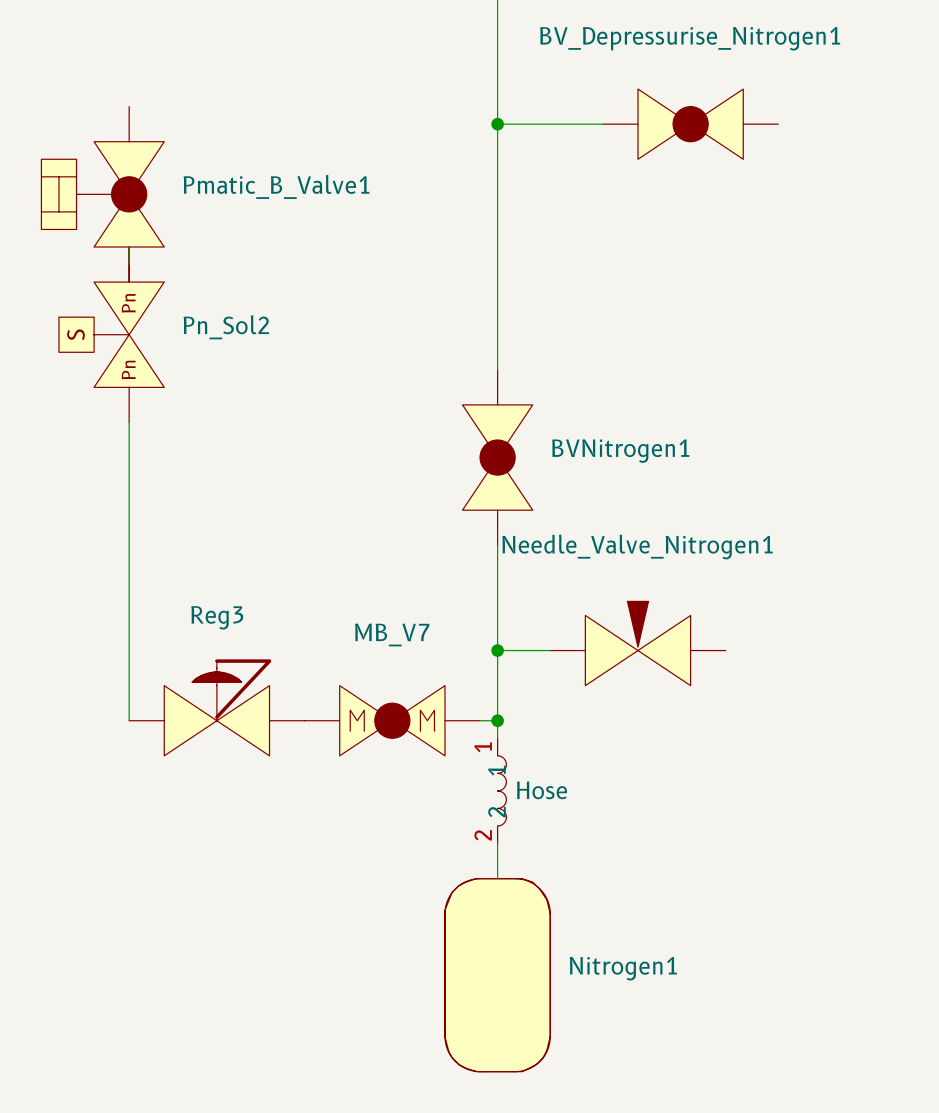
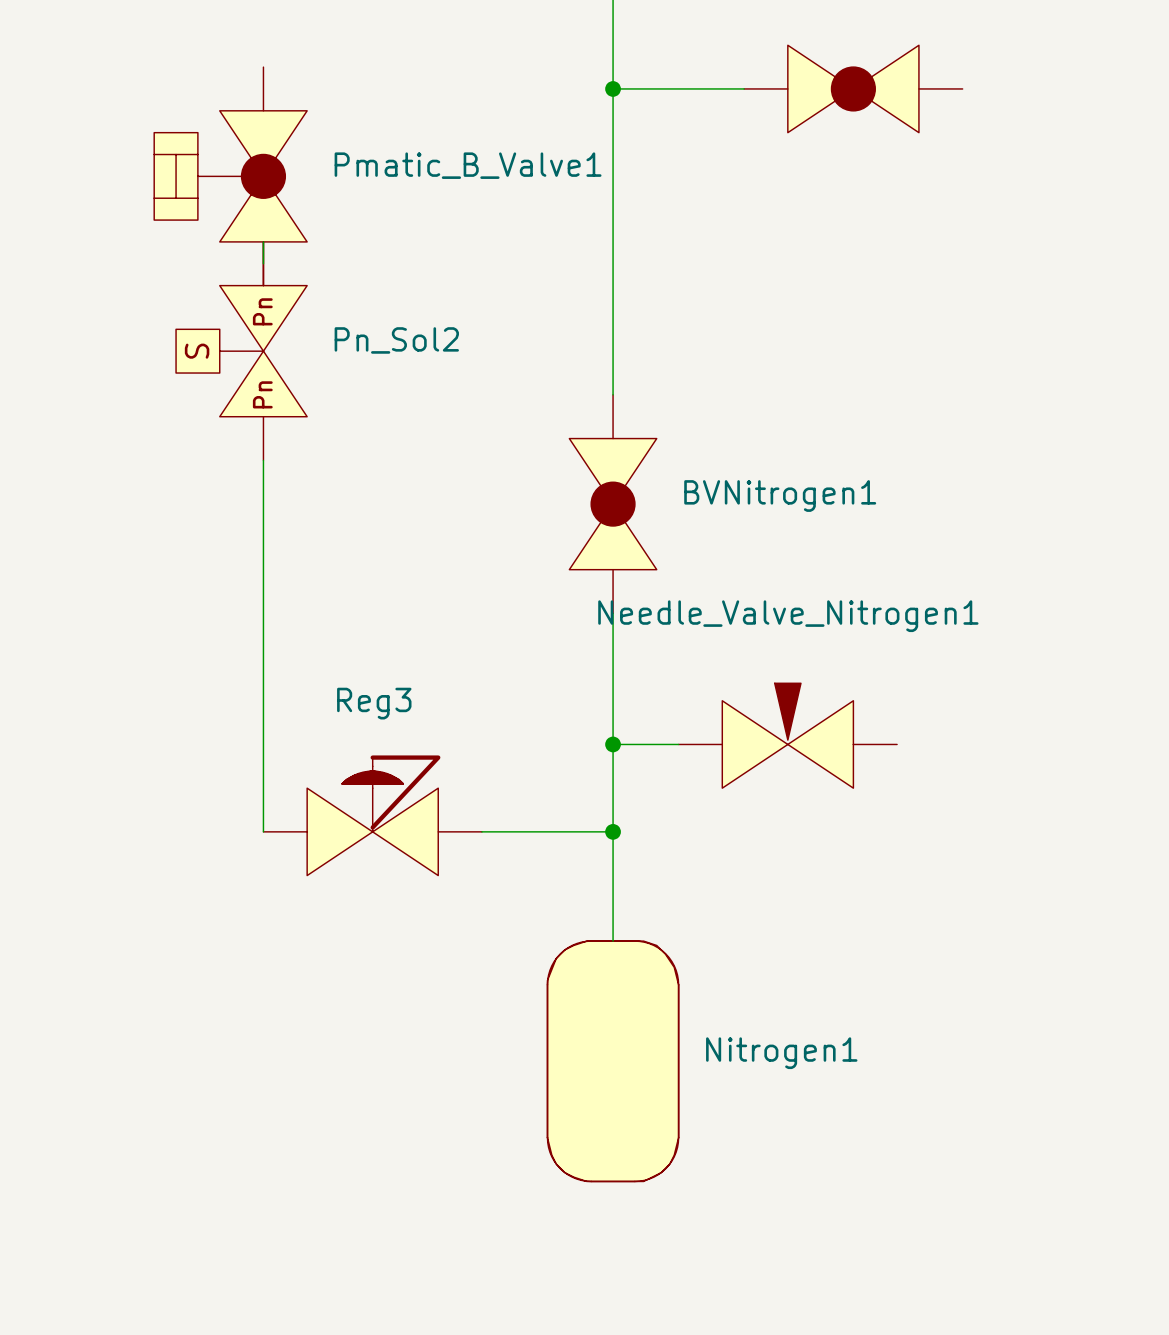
Pmatic_B_Valve1 position: (102, 194) -> (230, 176)
wire: (129, 246) (129, 264) -> (263, 241) (263, 263)
Pn_Sol2 position: (111, 334) -> (241, 351)
wire: (129, 422) (129, 720) -> (263, 460) (263, 831)
Reg3 position: (216, 707) -> (372, 815)
MB_V7: (392, 720) -> none
wire: none -> (613, 853) (613, 941)
Hose: (501, 790) -> none
Nitrogen1 position: (497, 975) -> (613, 1061)

